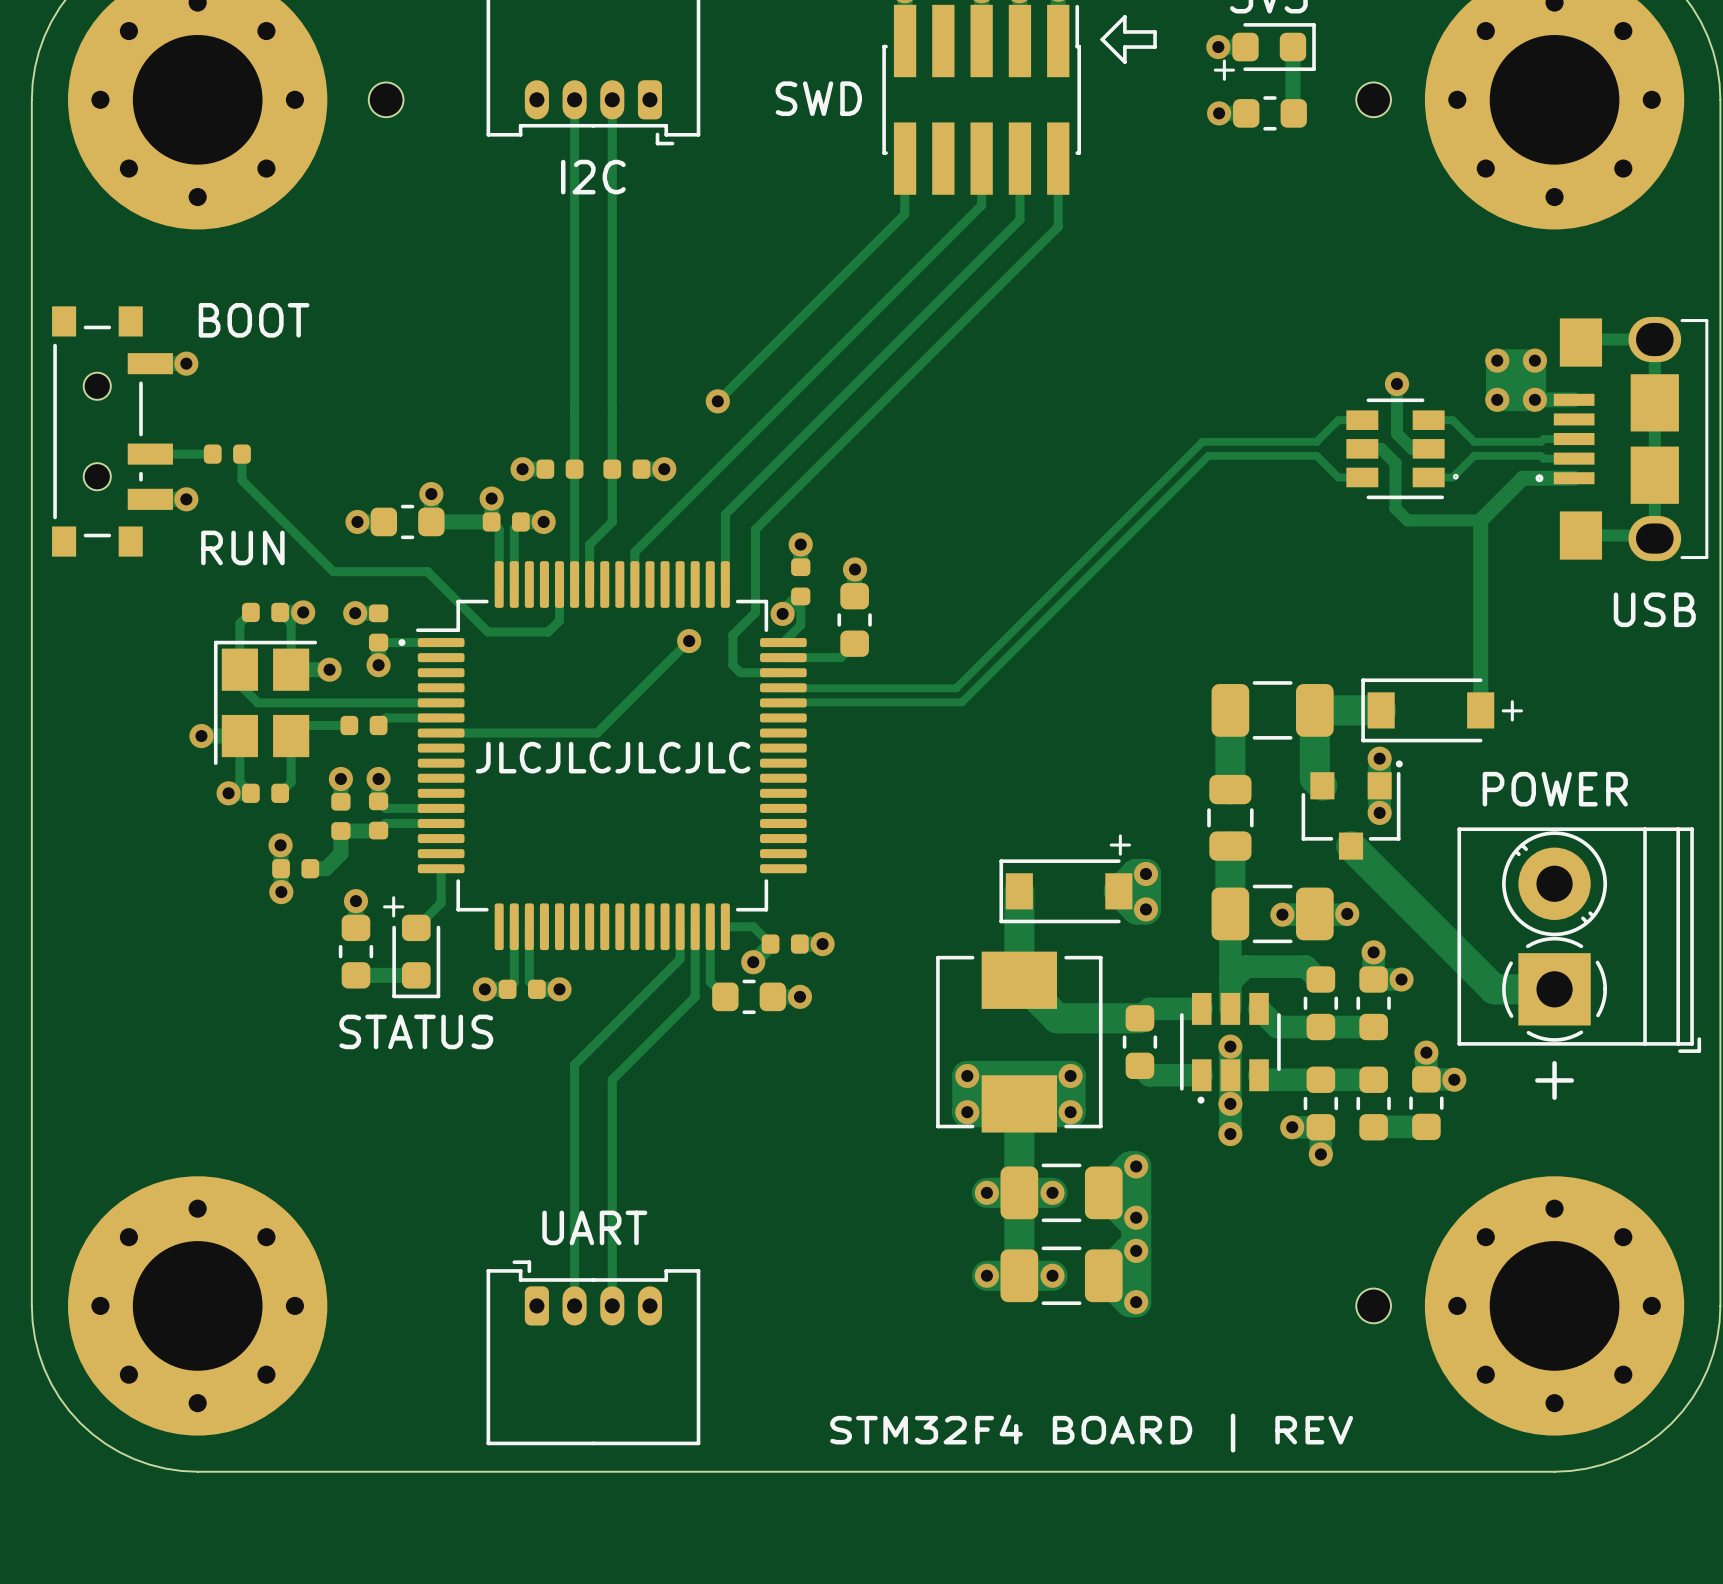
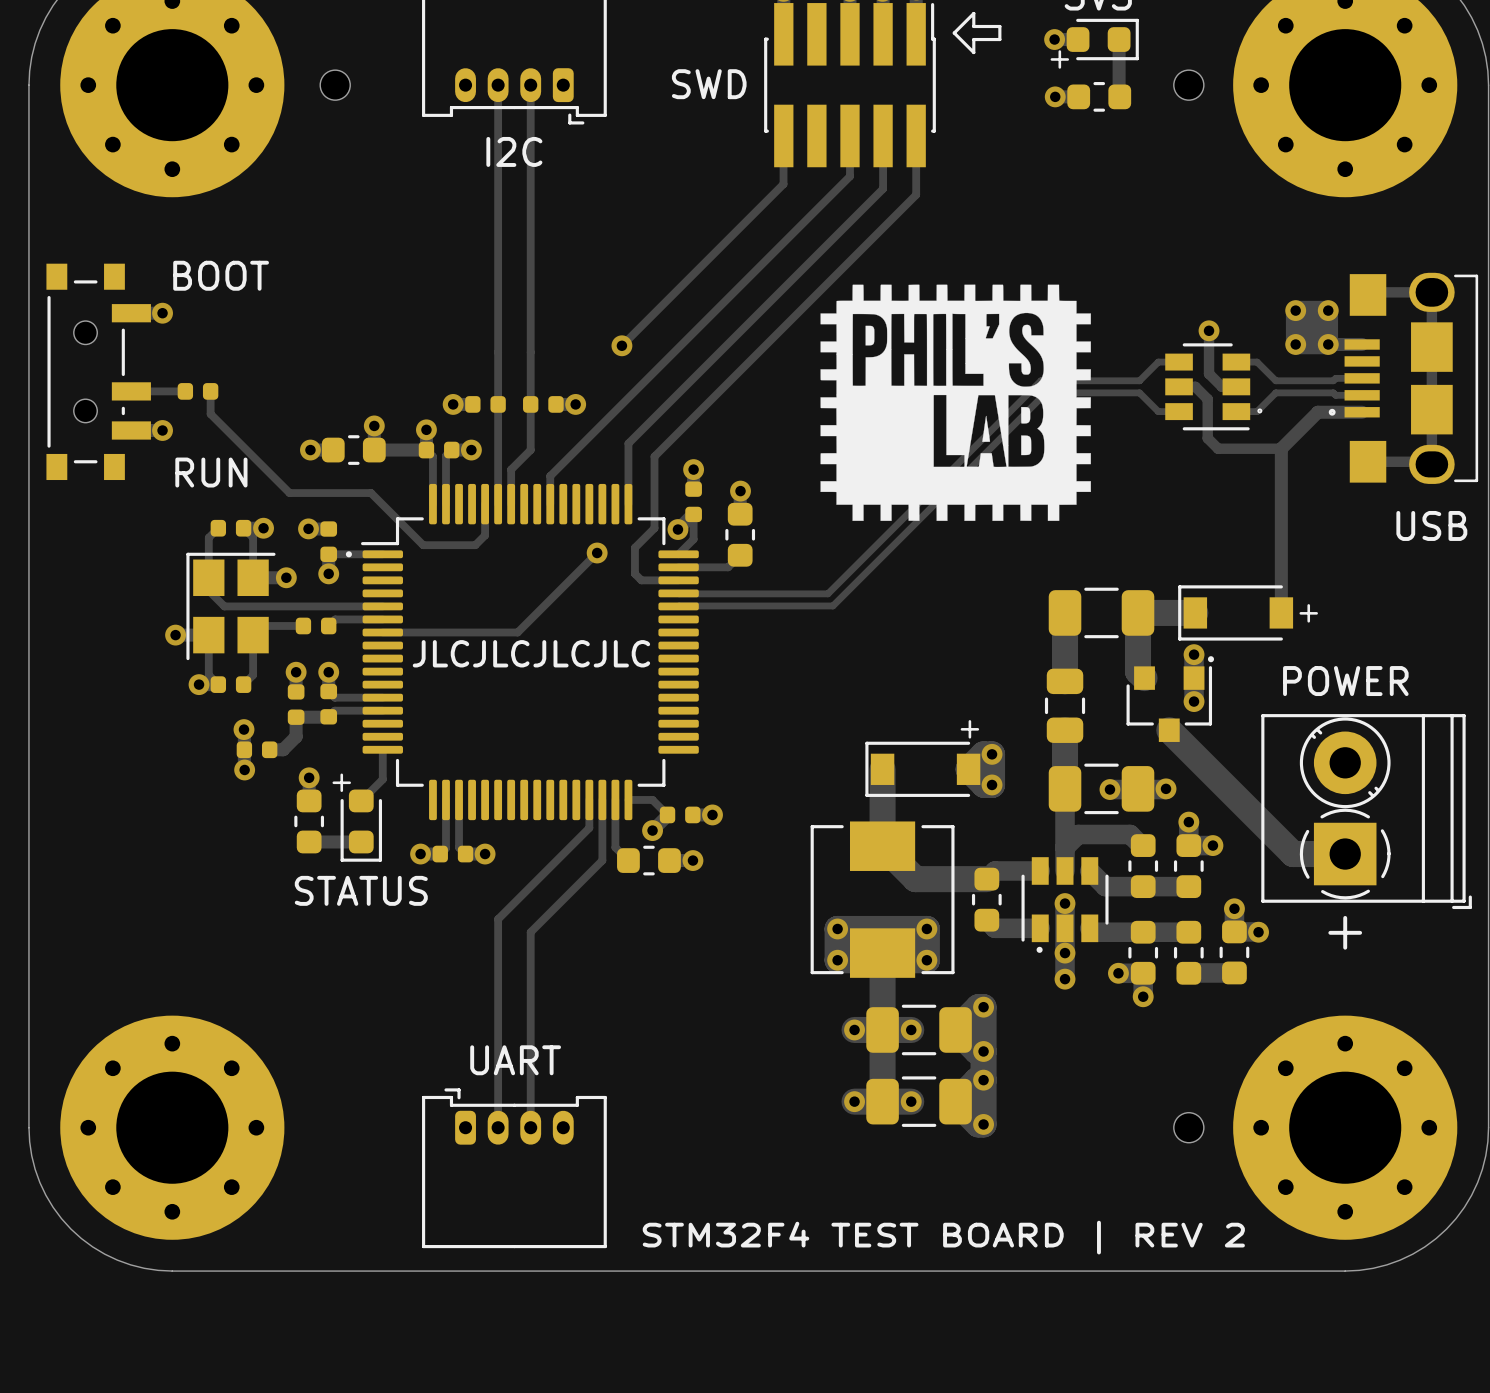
drawing: none -> [820, 284, 1091, 521]
text: STM32F4 BOARD | REV (1091, 1433) -> STM32F4 TEST BOARD | REV 2 (943, 1237)

